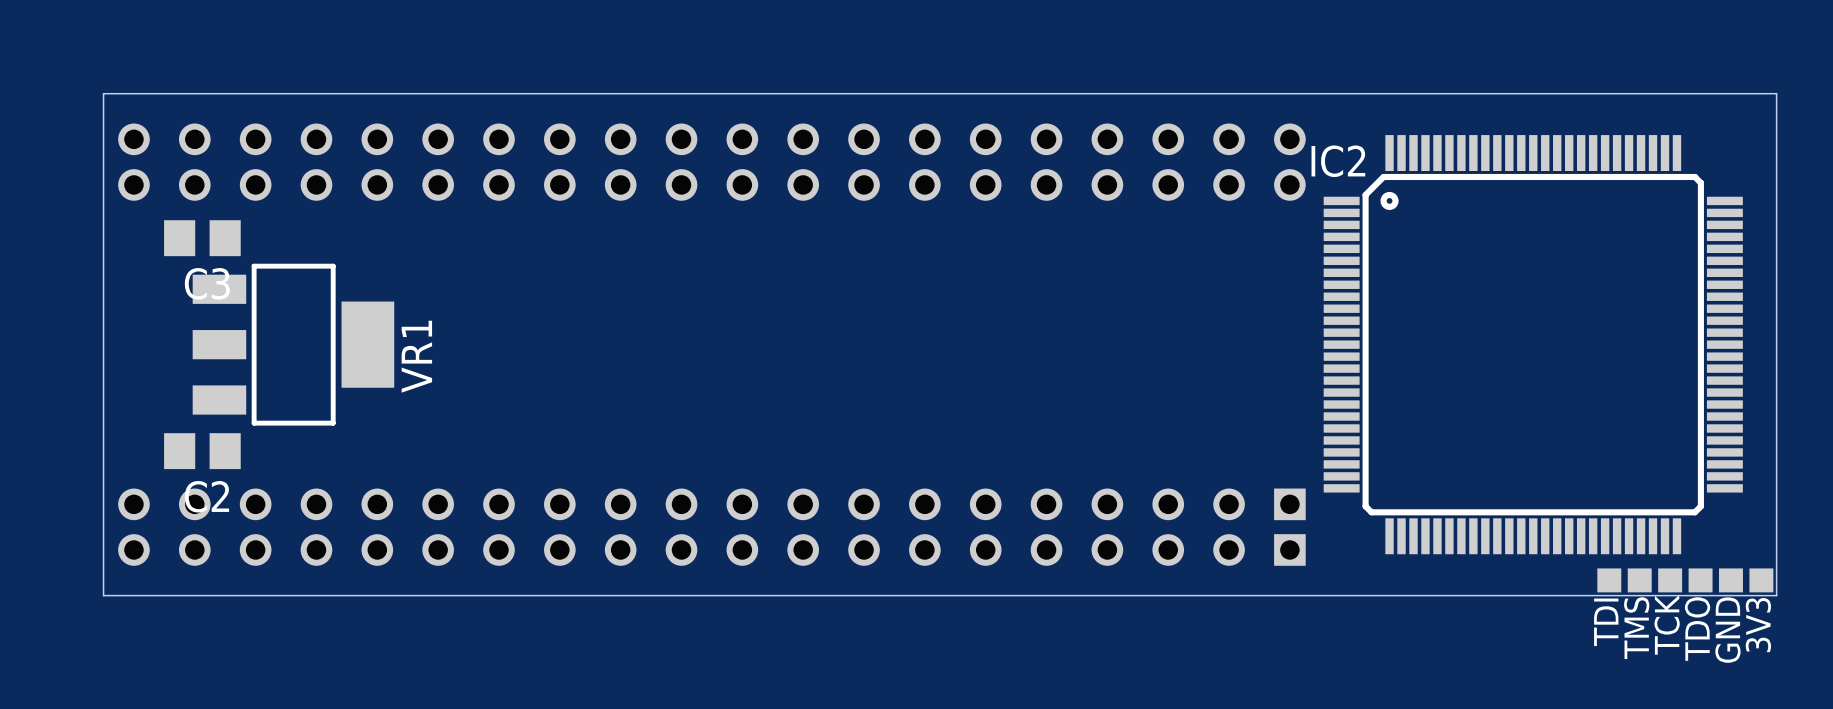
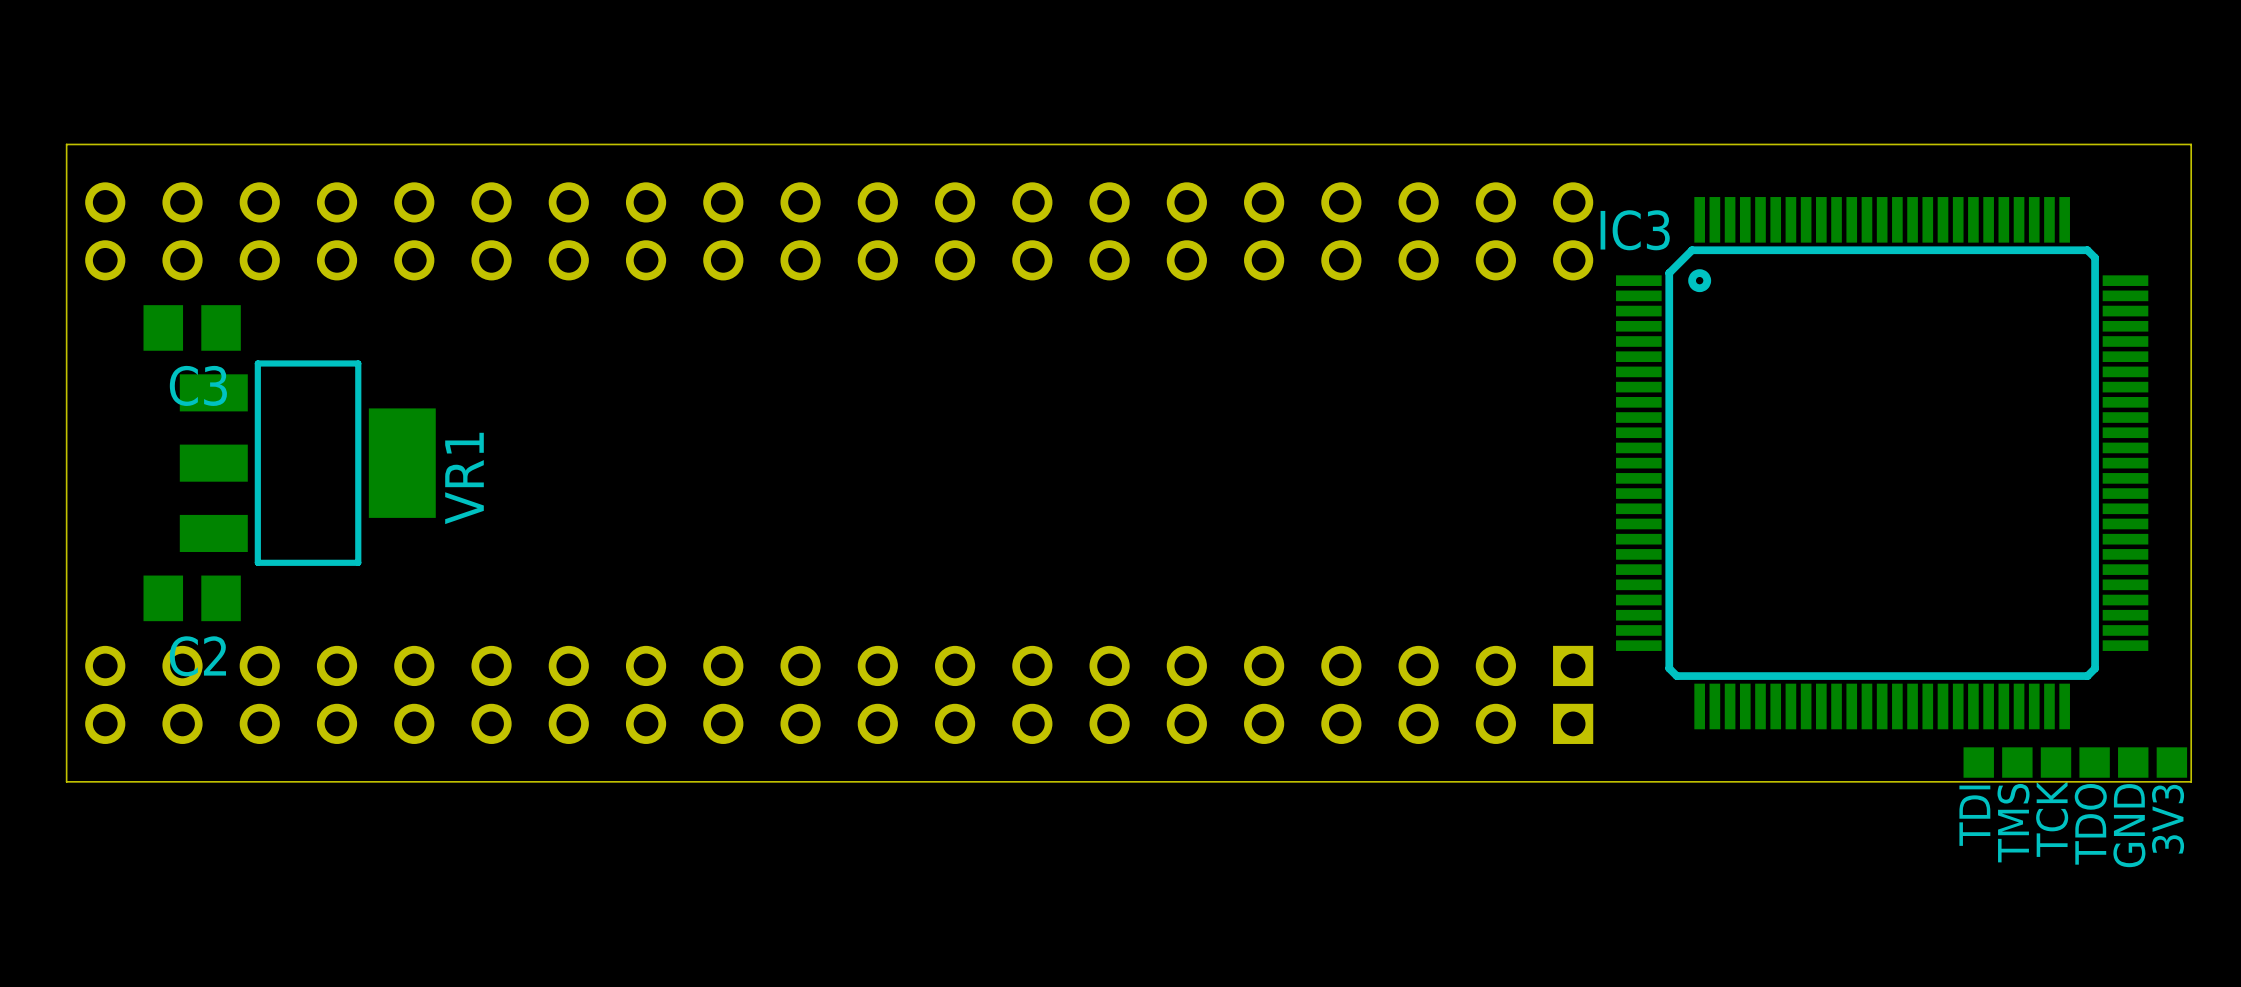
IC2 name: IC2 (1338, 161) -> IC3 (1635, 230)

